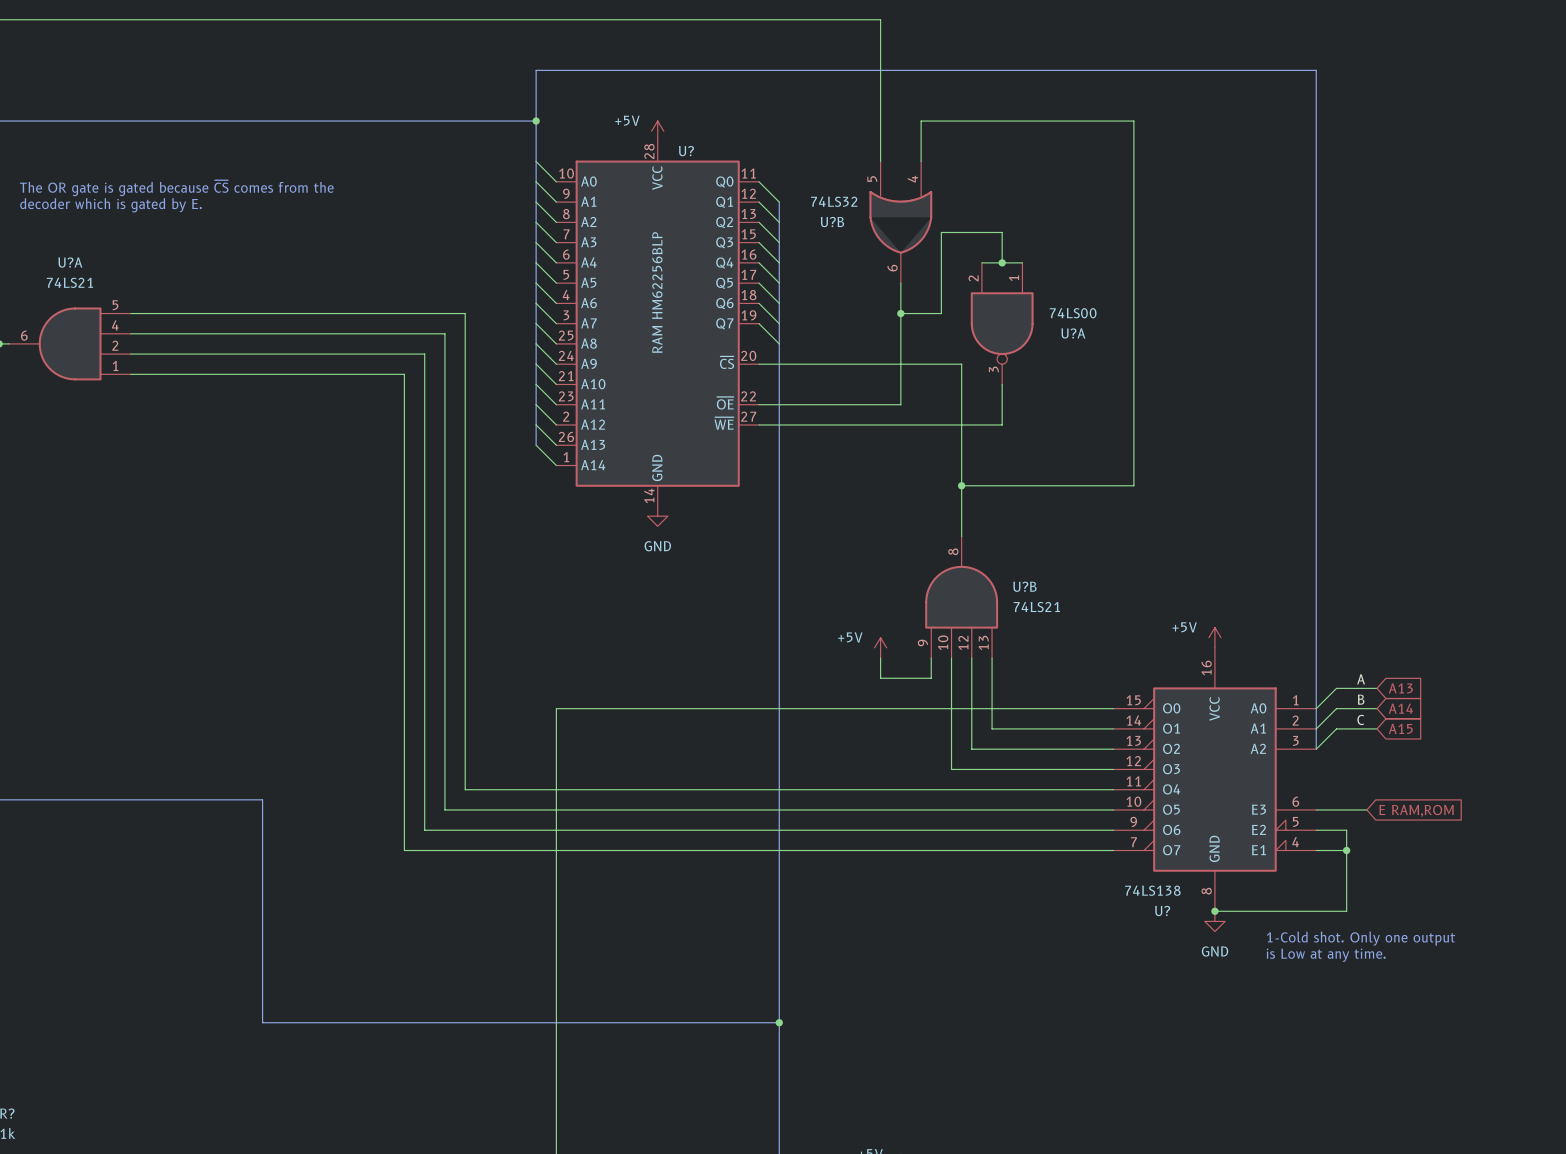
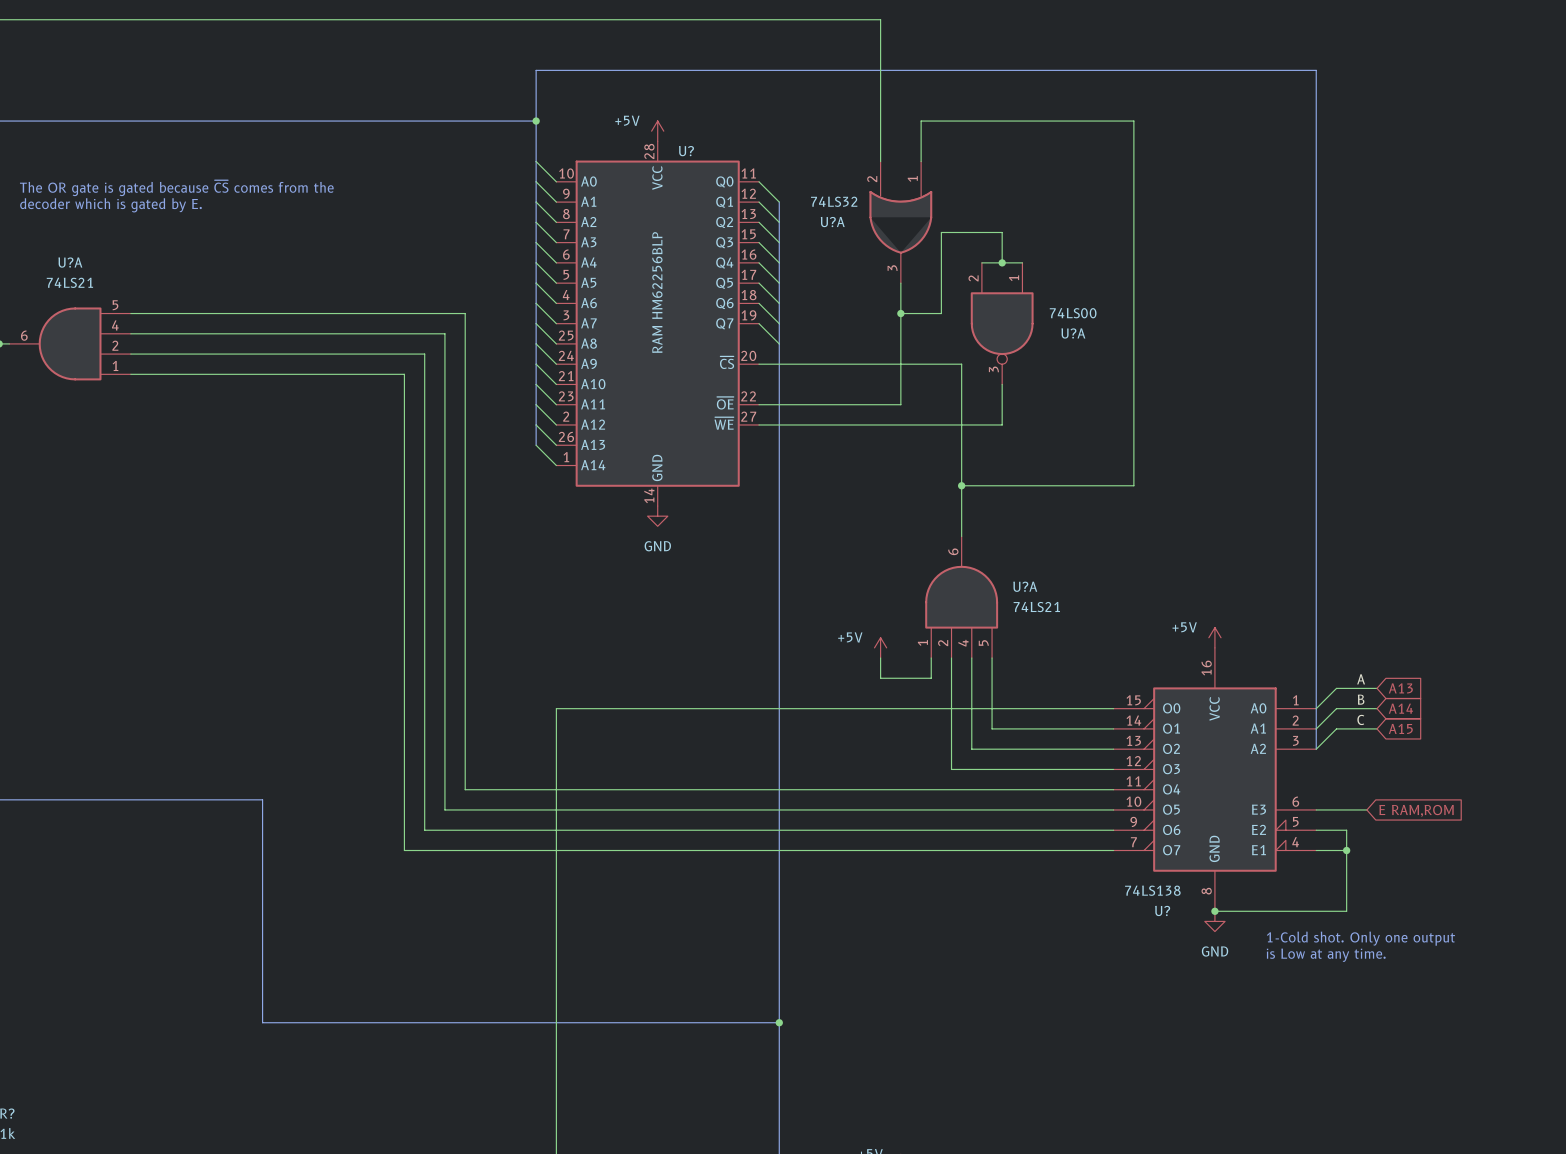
U?B pin number: 5 (872, 178) -> 2 (872, 179)
U?B pin number: 4 (912, 179) -> 1 (912, 178)
U?B name: U?B (832, 222) -> U?A (832, 222)
U?B pin number: 6 (892, 268) -> 3 (892, 268)
U?B pin number: 8 (953, 551) -> 6 (953, 551)
U?B name: U?B (1024, 586) -> U?A (1025, 586)
U?B pin number: 9 (922, 642) -> 1 (922, 642)
U?B pin number: 10 (943, 642) -> 2 (943, 643)
U?B pin number: 12 (963, 642) -> 4 (963, 643)
U?B pin number: 13 (983, 642) -> 5 (983, 642)

